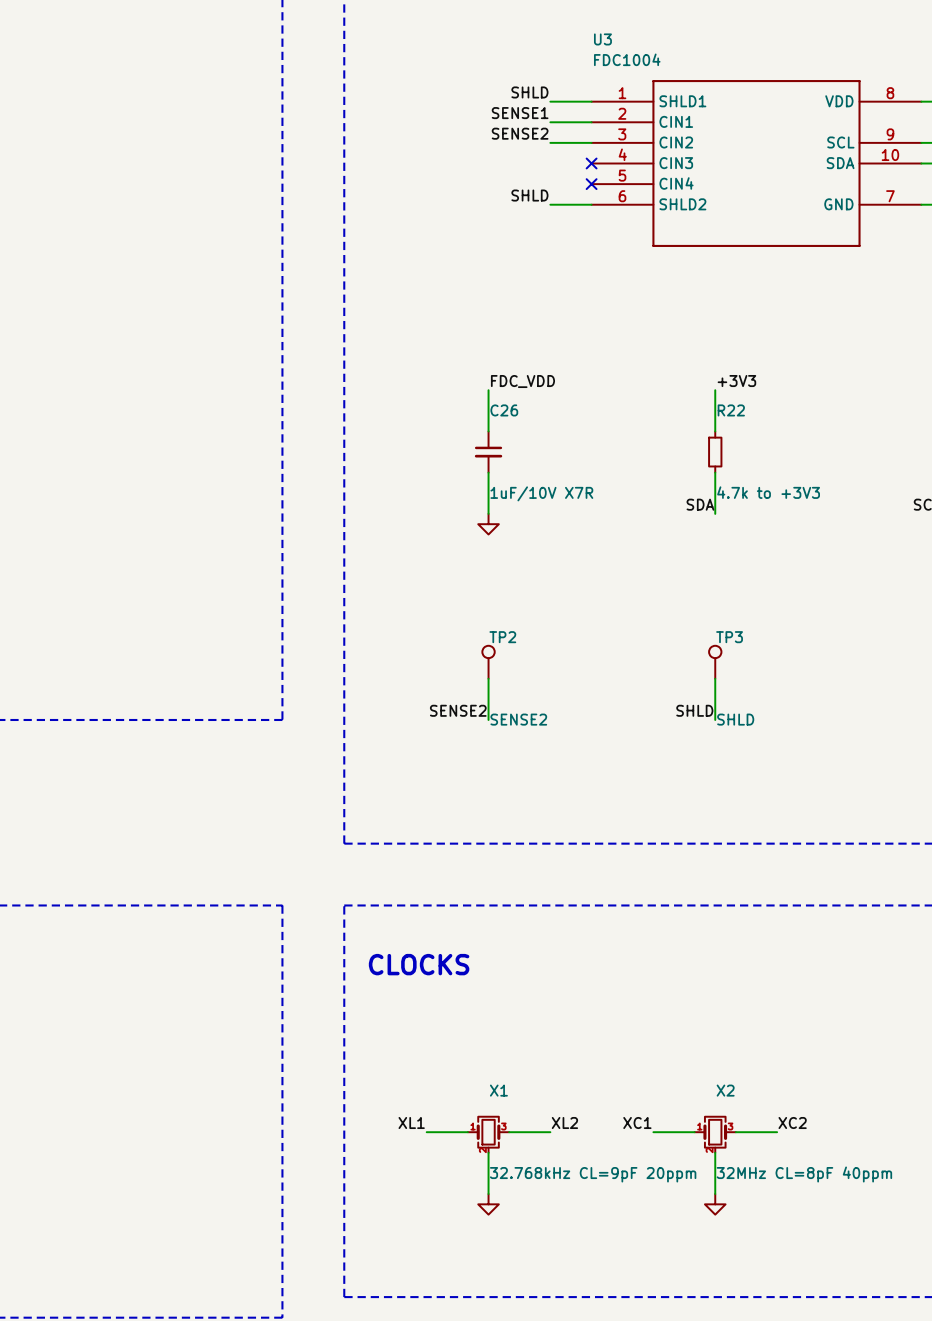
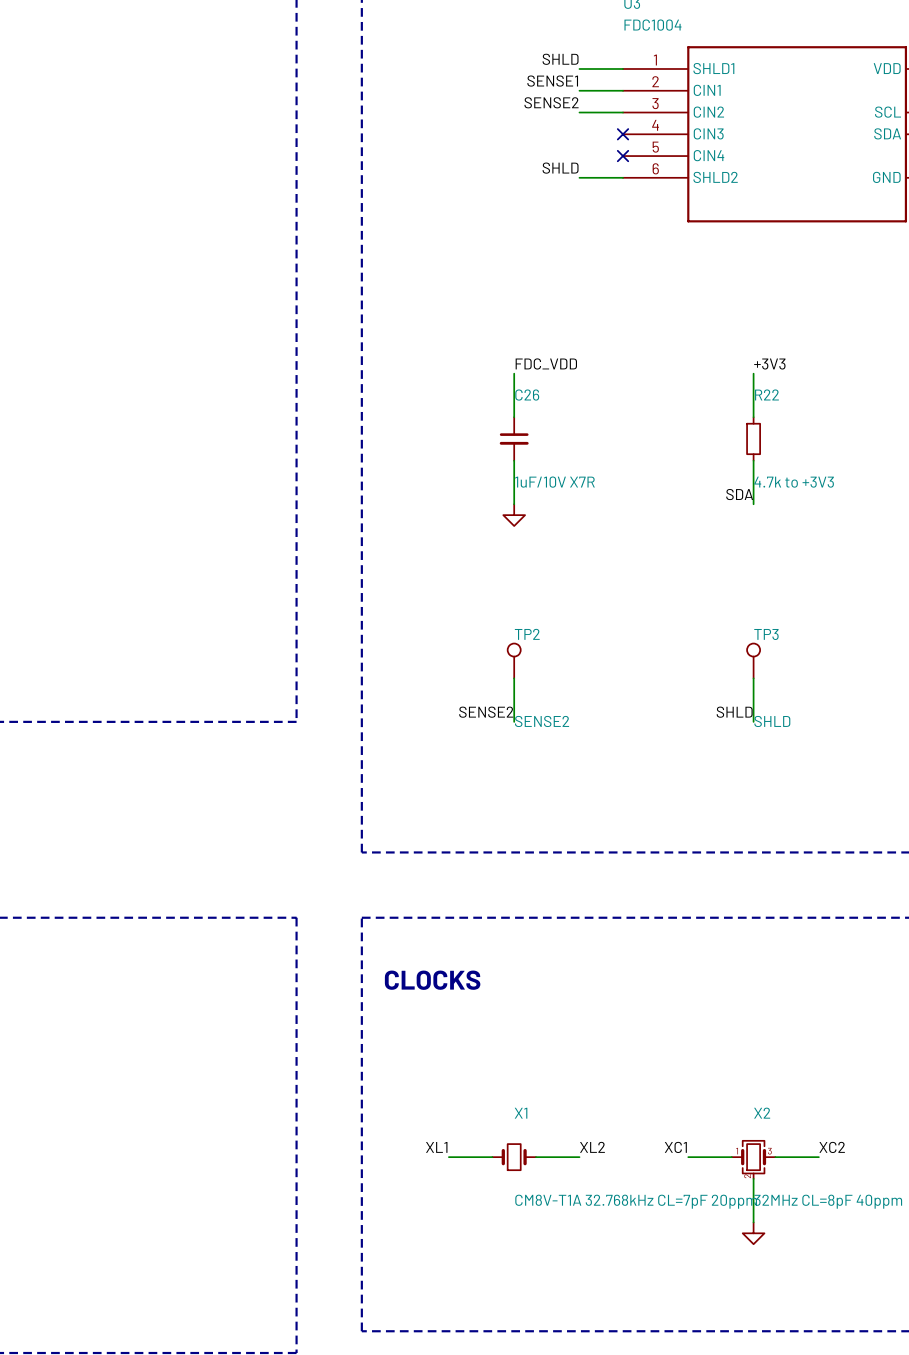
X1 symbol: [467, 1116, 510, 1153] -> [492, 1144, 536, 1171]
wire: (488, 1152) (488, 1194) -> none
X1 value: 32.768kHz CL=9pF 20ppm (593, 1174) -> CM8V-T1A 32.768kHz CL=7pF 20ppm (636, 1201)
power symbol: (488, 1204) -> none

